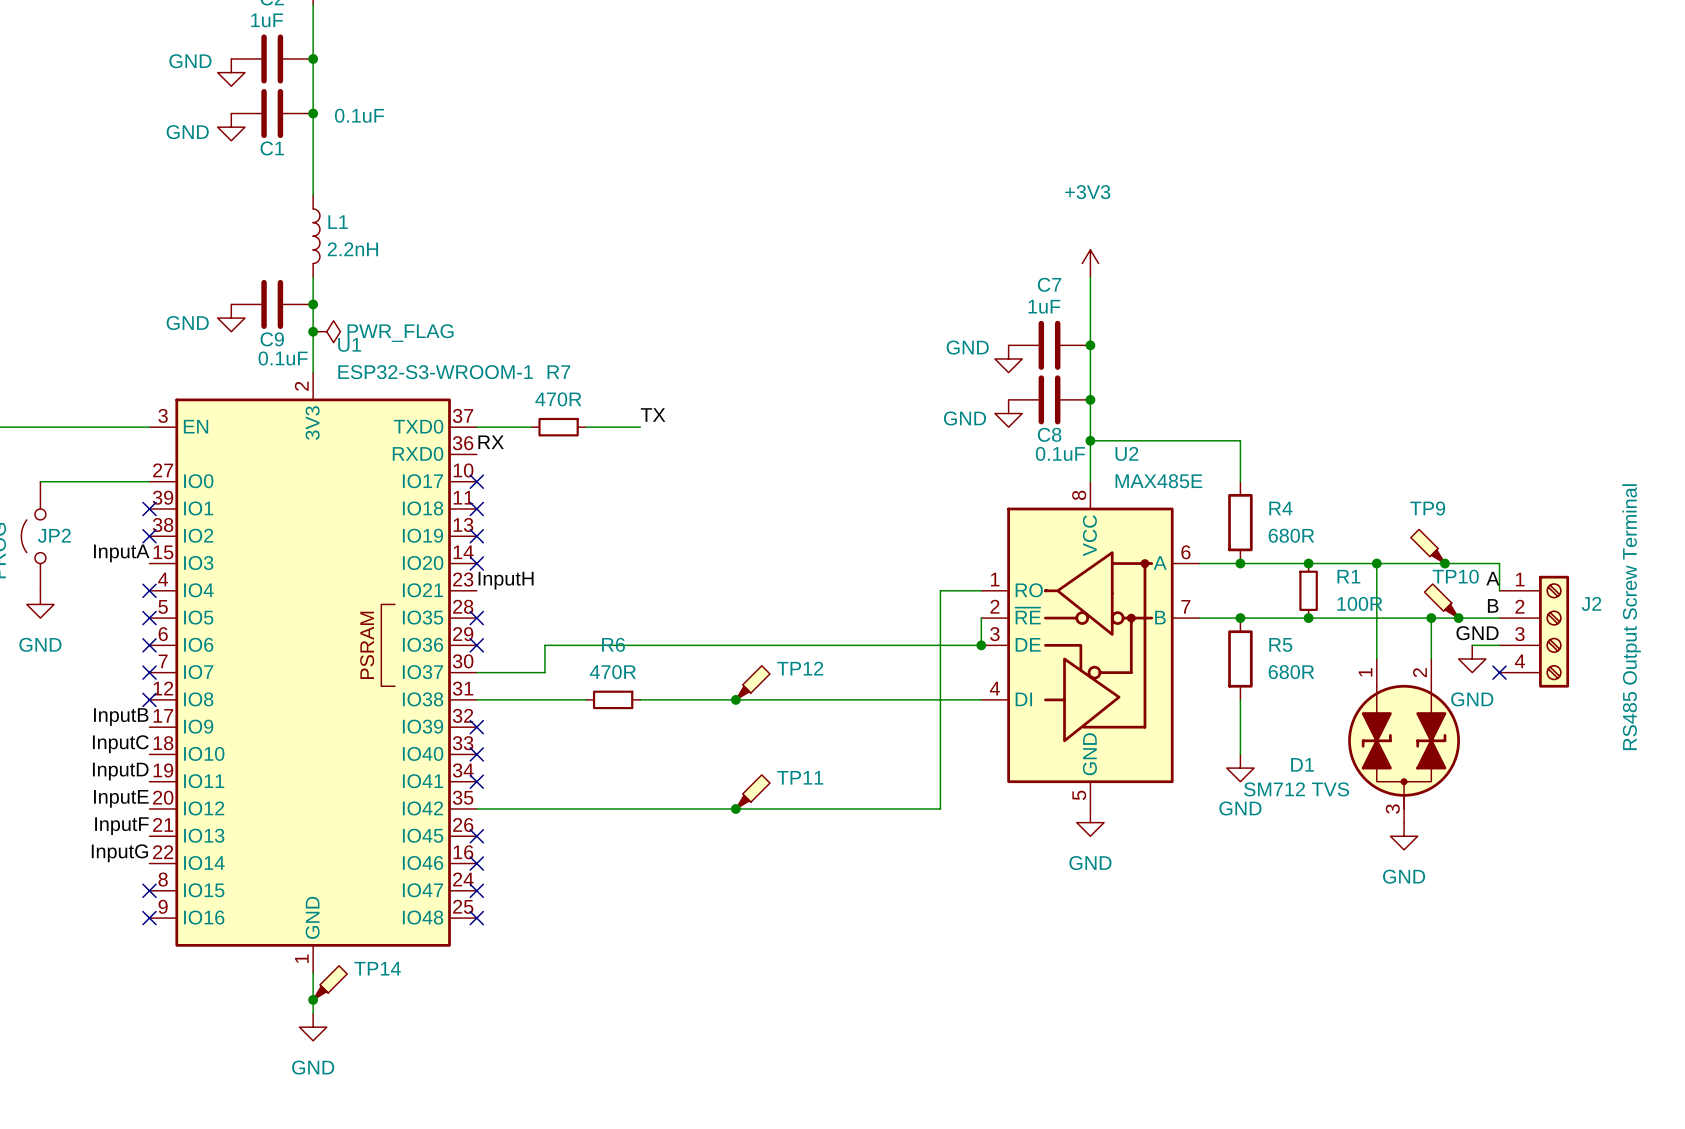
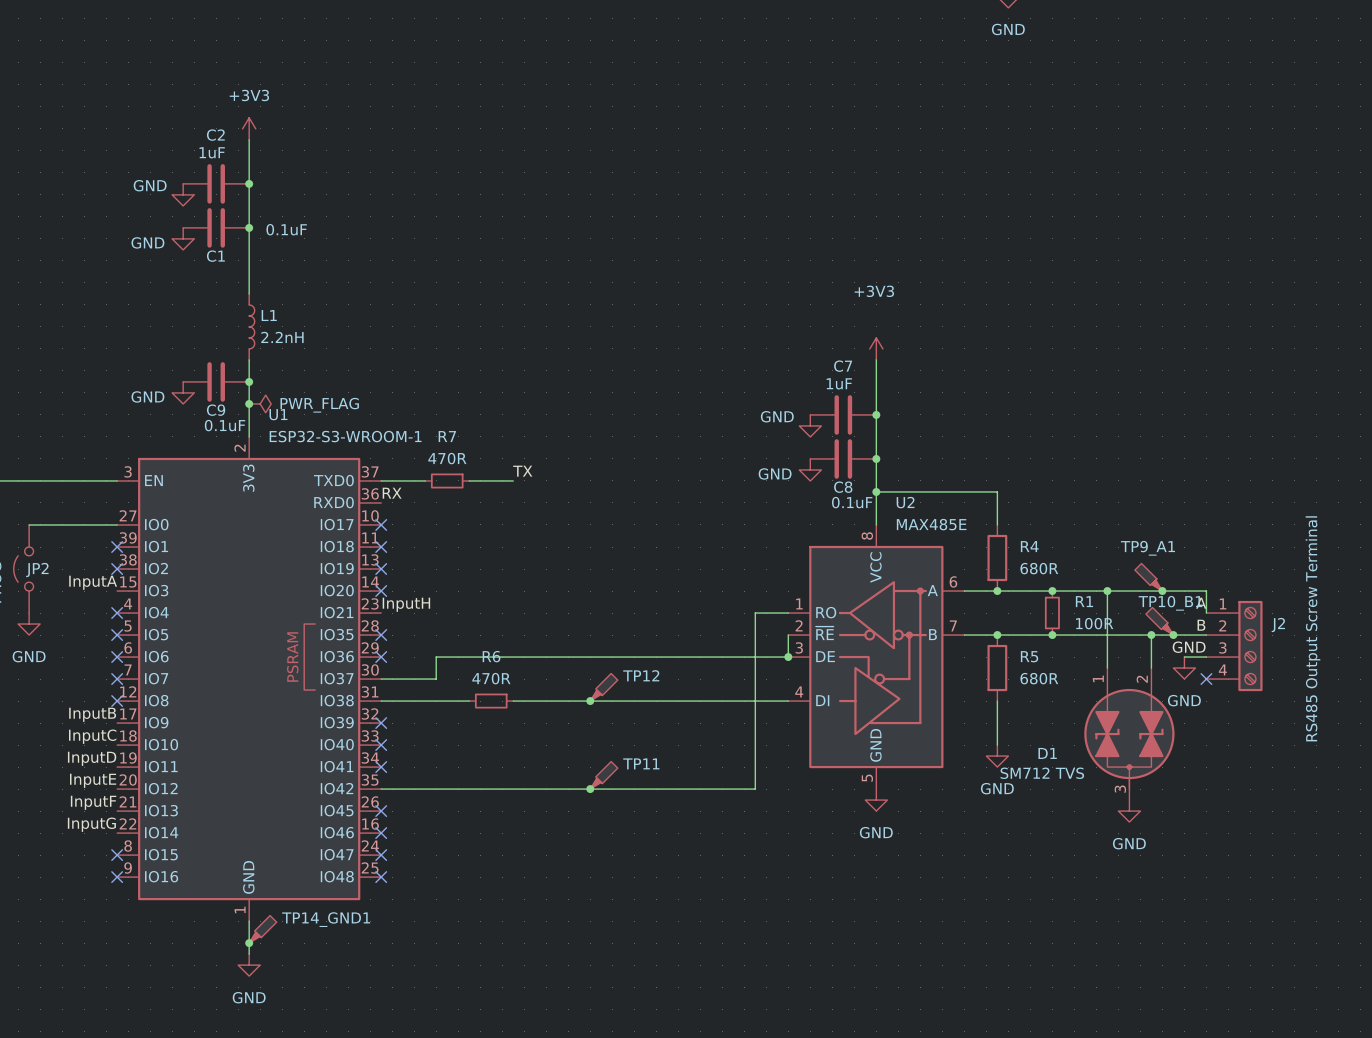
TP9 name: TP9 (1427, 508) -> TP9_A1 (1147, 548)
TP10 name: TP10 (1455, 576) -> TP10_B1 (1170, 603)
TP14 name: TP14 (377, 968) -> TP14_GND1 (326, 919)

